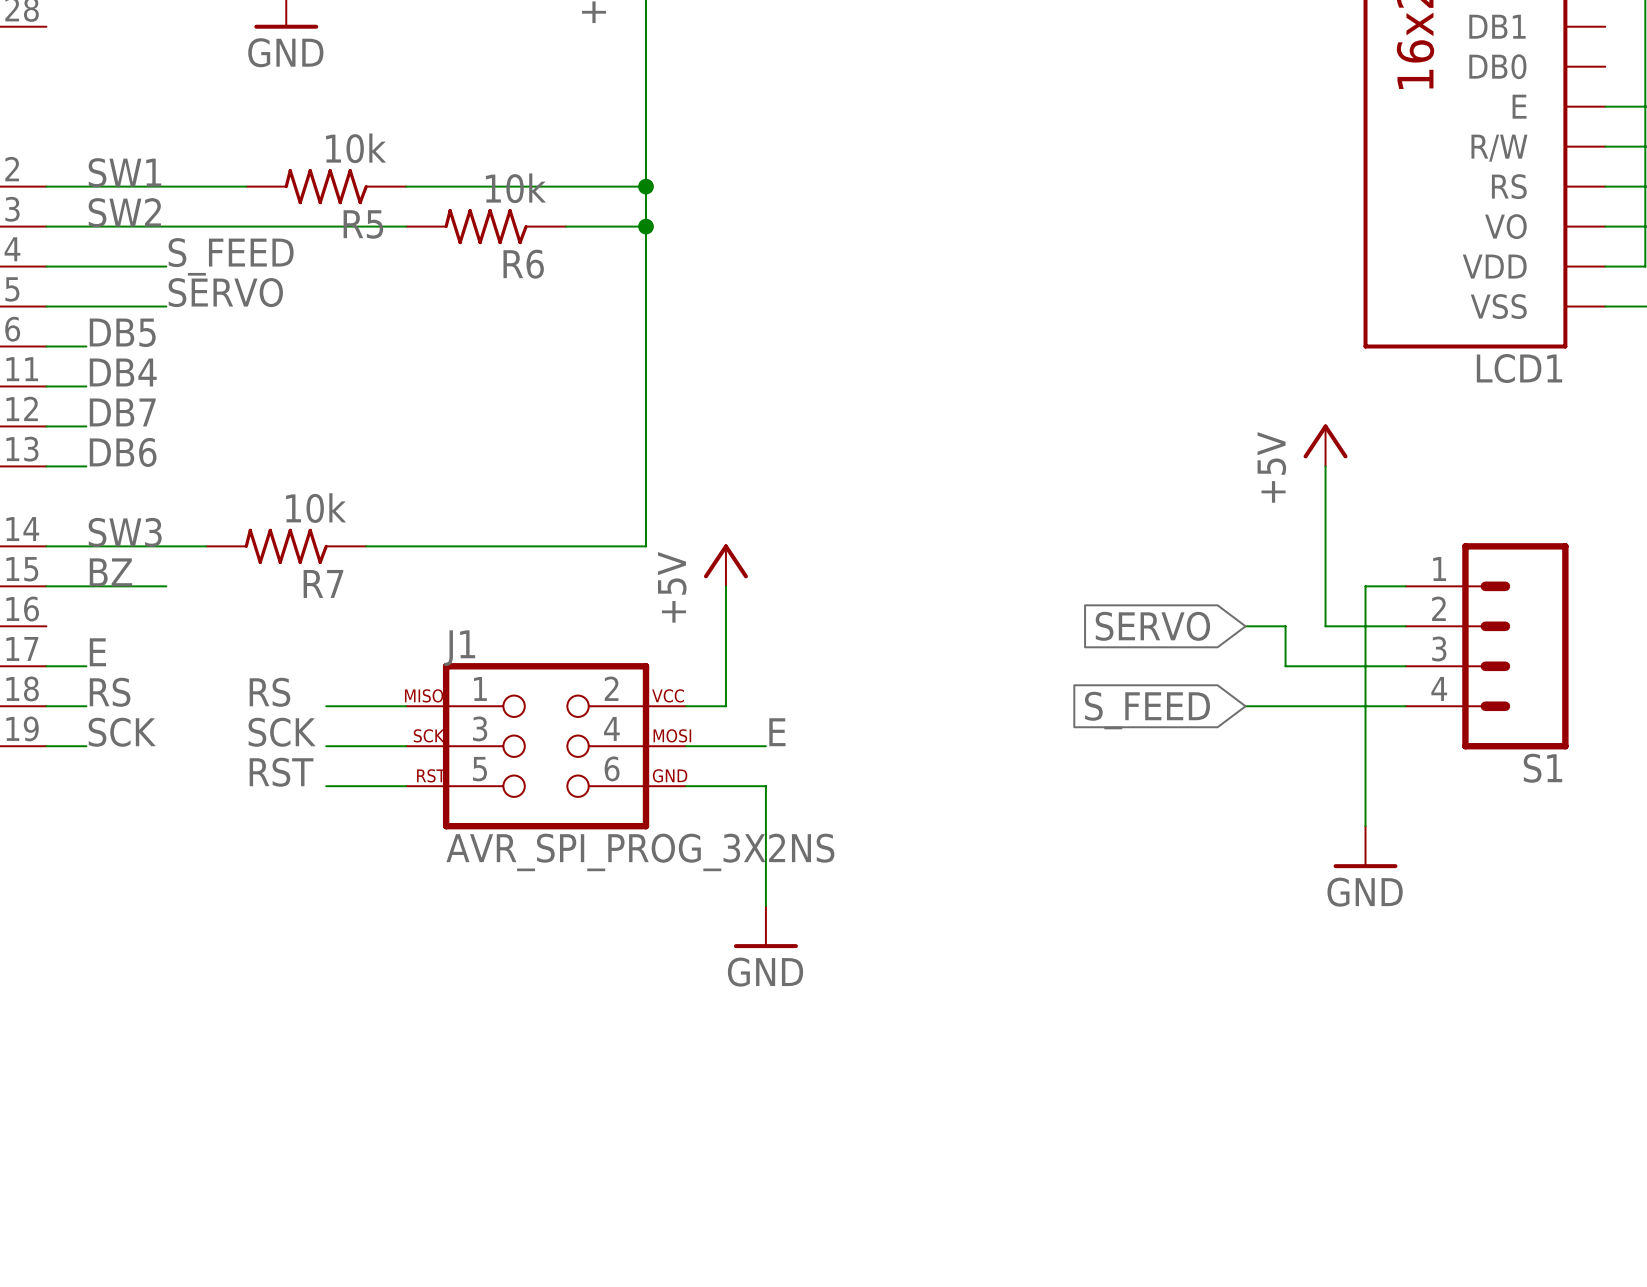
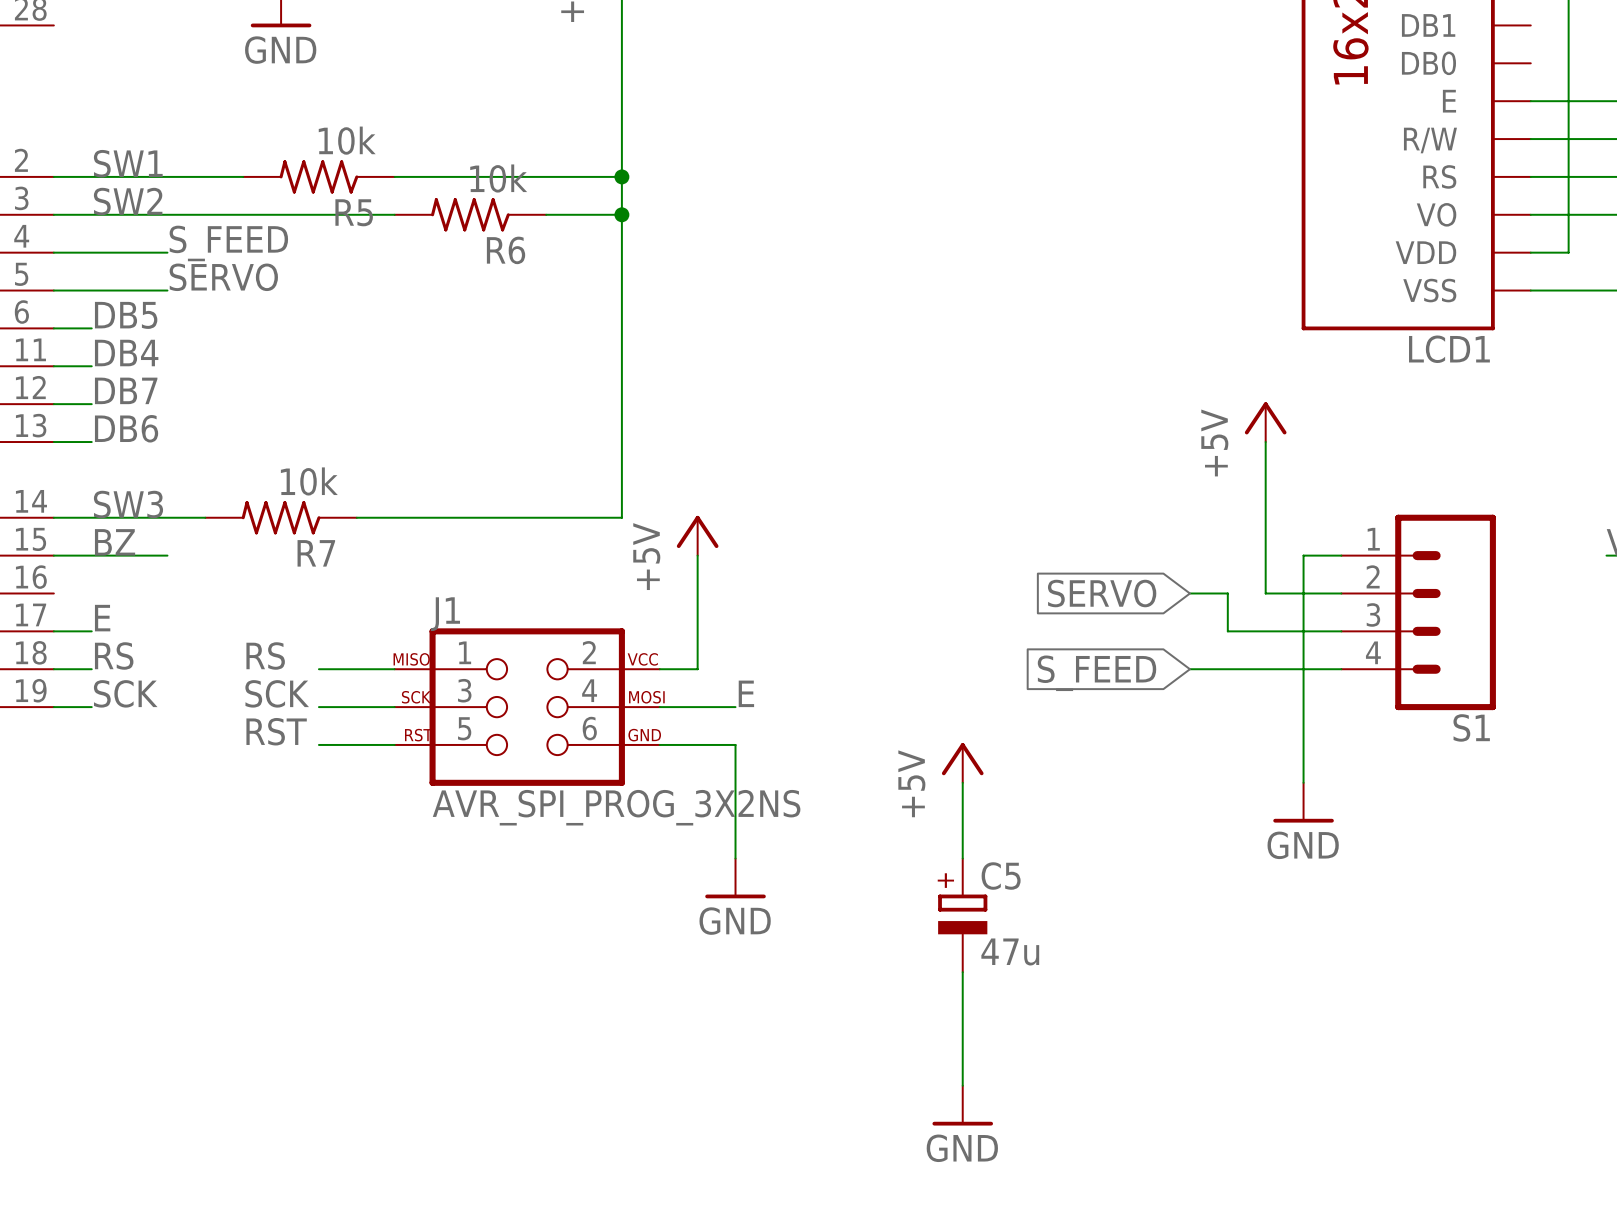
power symbol: none -> +5V (962, 762)
wire: none -> (962, 782) (962, 858)
C5: none -> 47u (962, 915)
wire: none -> (962, 972) (962, 1085)
power symbol: none -> GND (962, 1105)

